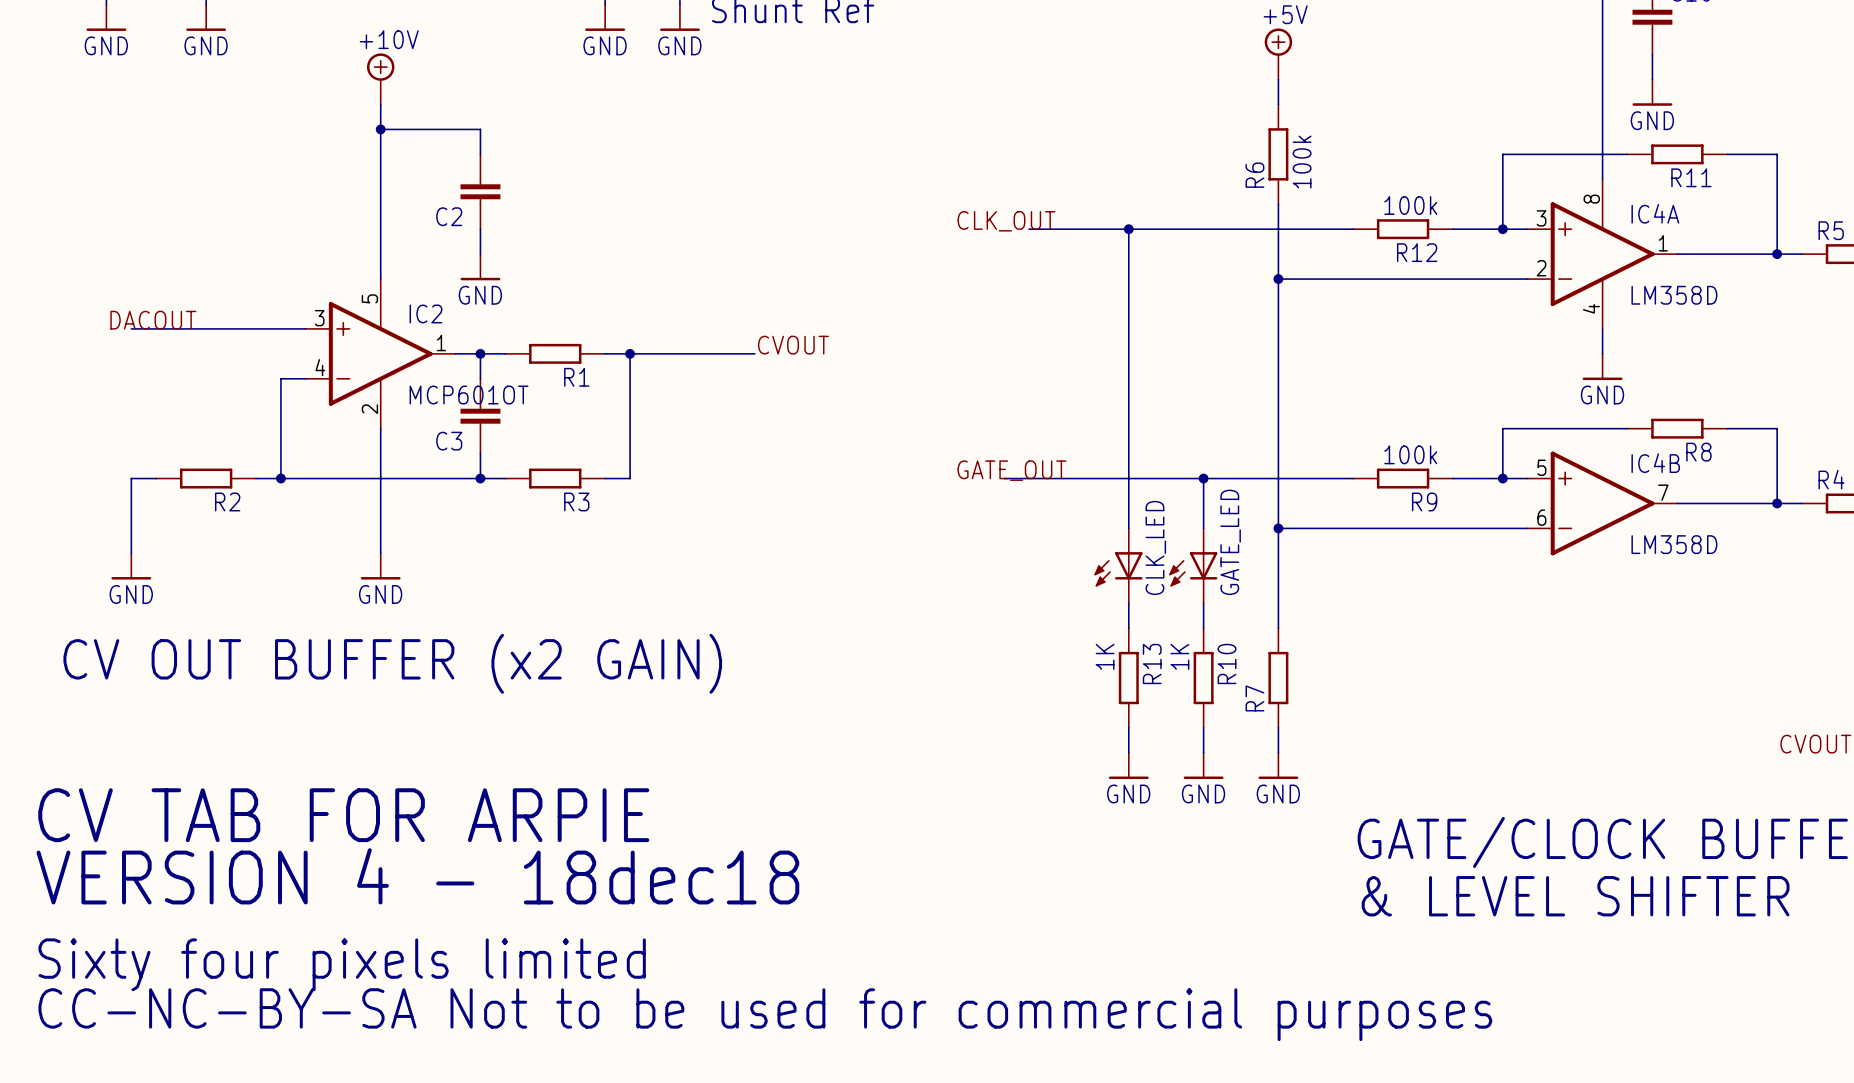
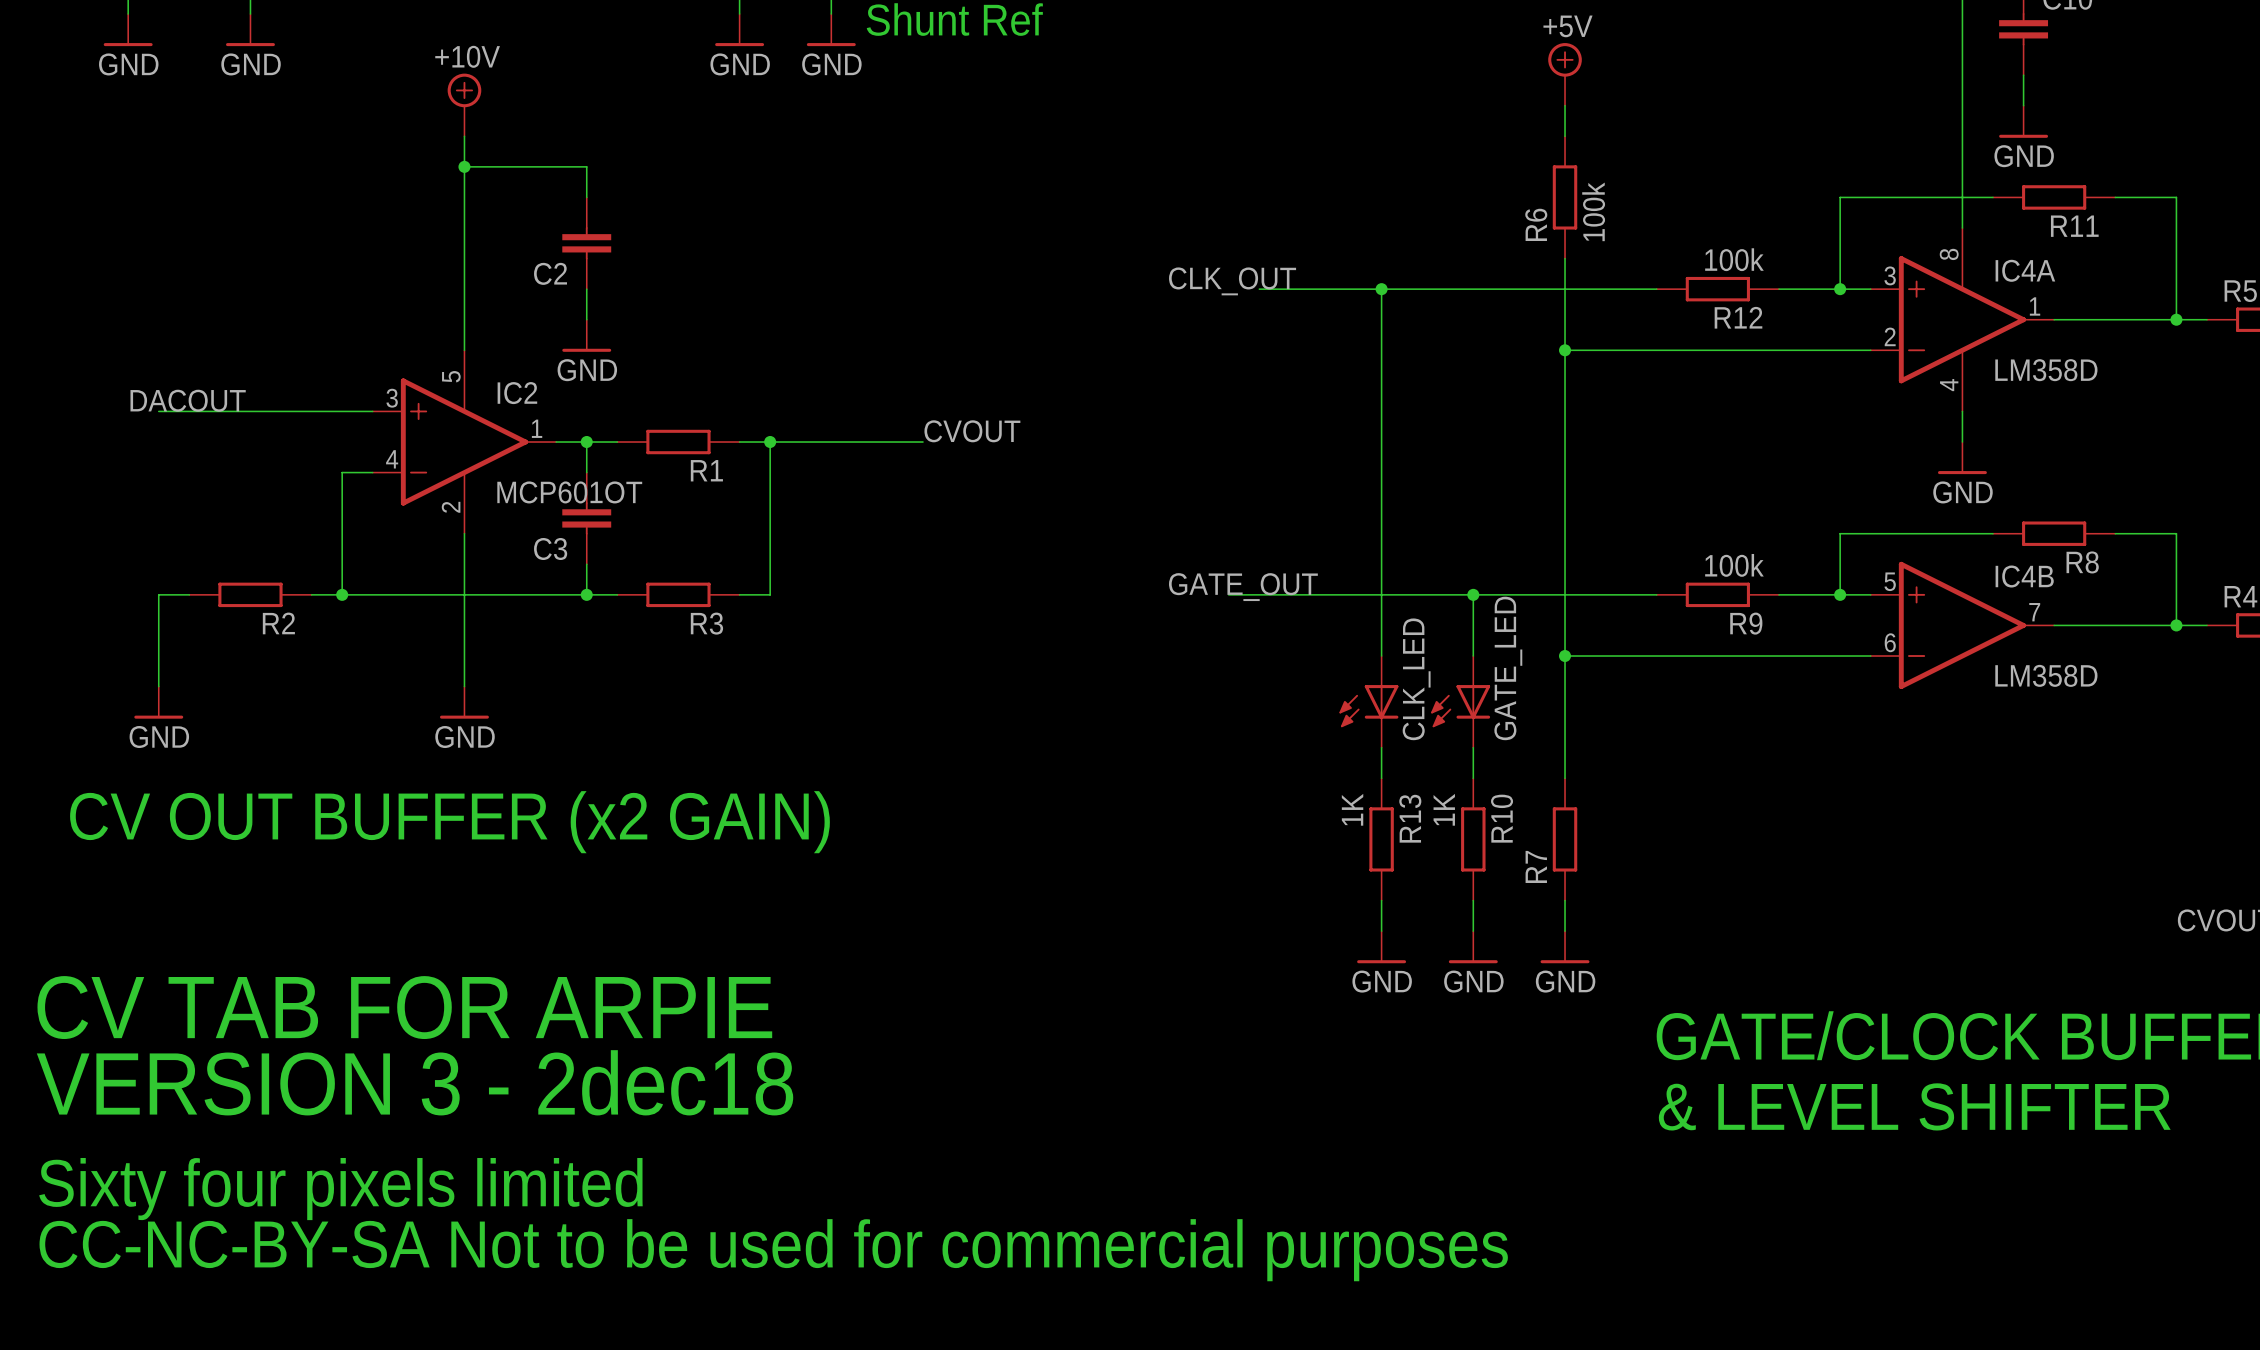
text: VERSION 4 - 18dec18 (417, 876) -> VERSION 3 - 2dec18 (415, 1082)

